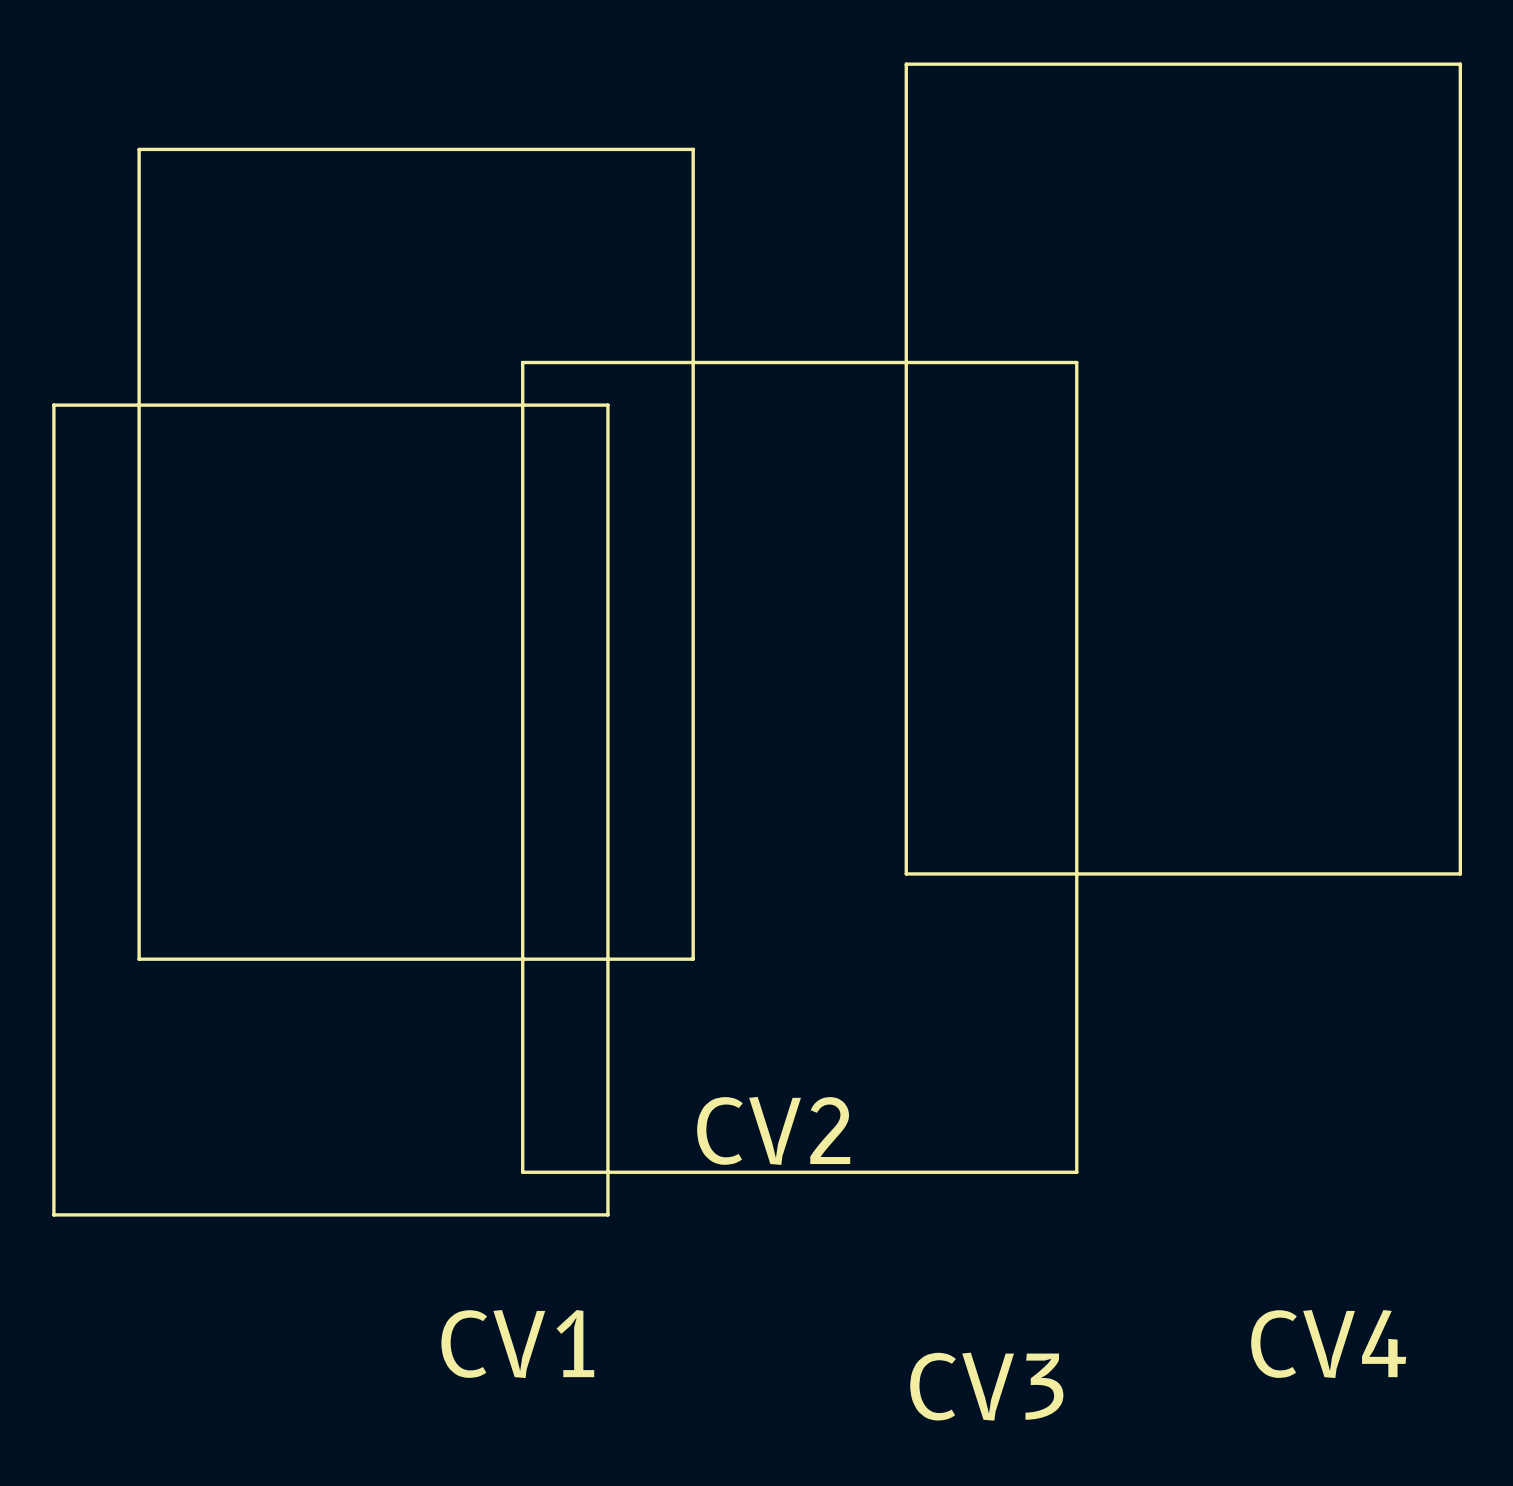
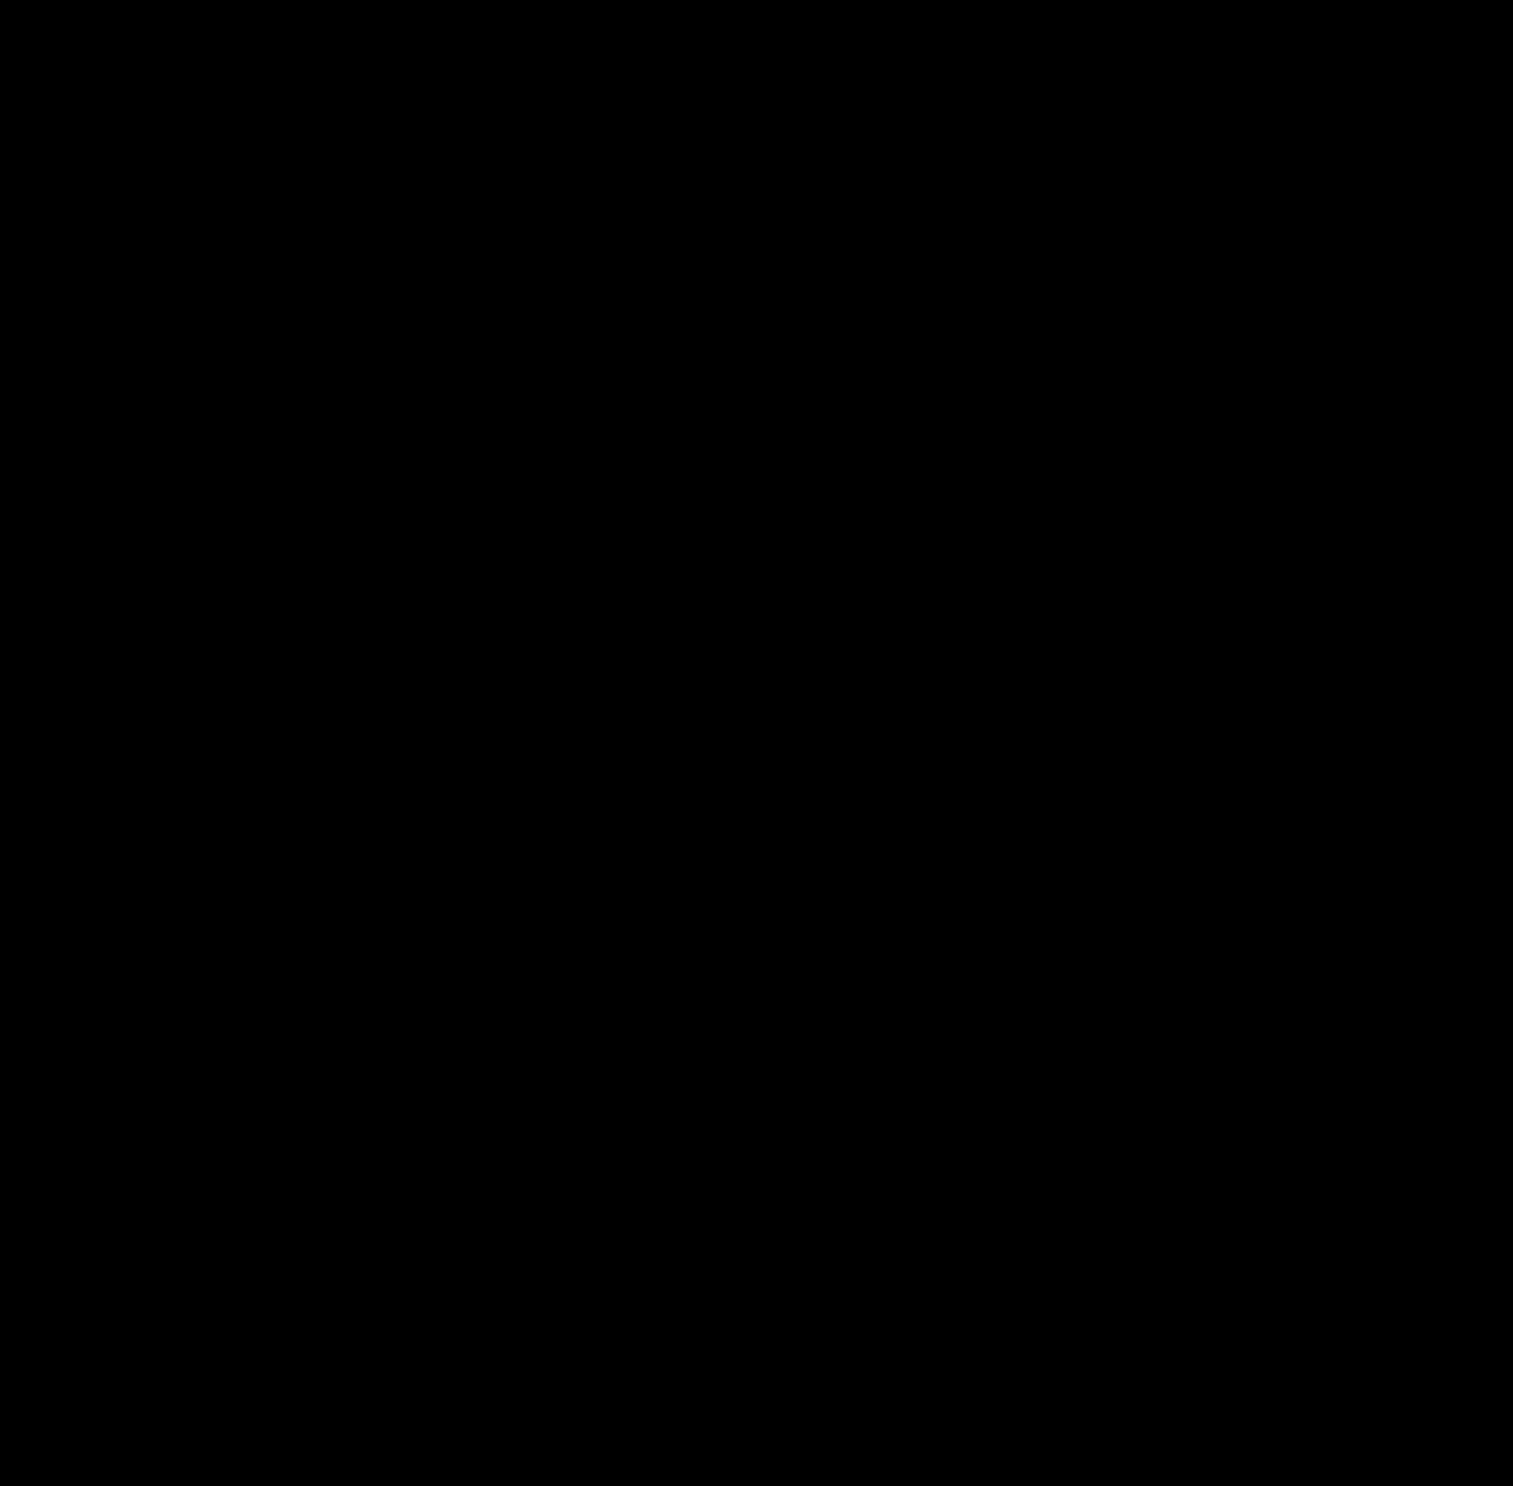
line: (906, 64) (1460, 64) (1460, 873) (906, 873) (906, 64) -> none
line: (139, 149) (693, 149) (693, 959) (139, 959) (139, 149) -> none
line: (522, 362) (1076, 362) (1076, 1172) (522, 1172) (522, 362) -> none
line: (53, 405) (607, 405) (607, 1214) (53, 1214) (53, 405) -> none
text: CV2 (773, 1130) -> none
text: CV1 (517, 1344) -> none
text: CV4 (1328, 1344) -> none
text: CV3 (986, 1386) -> none

